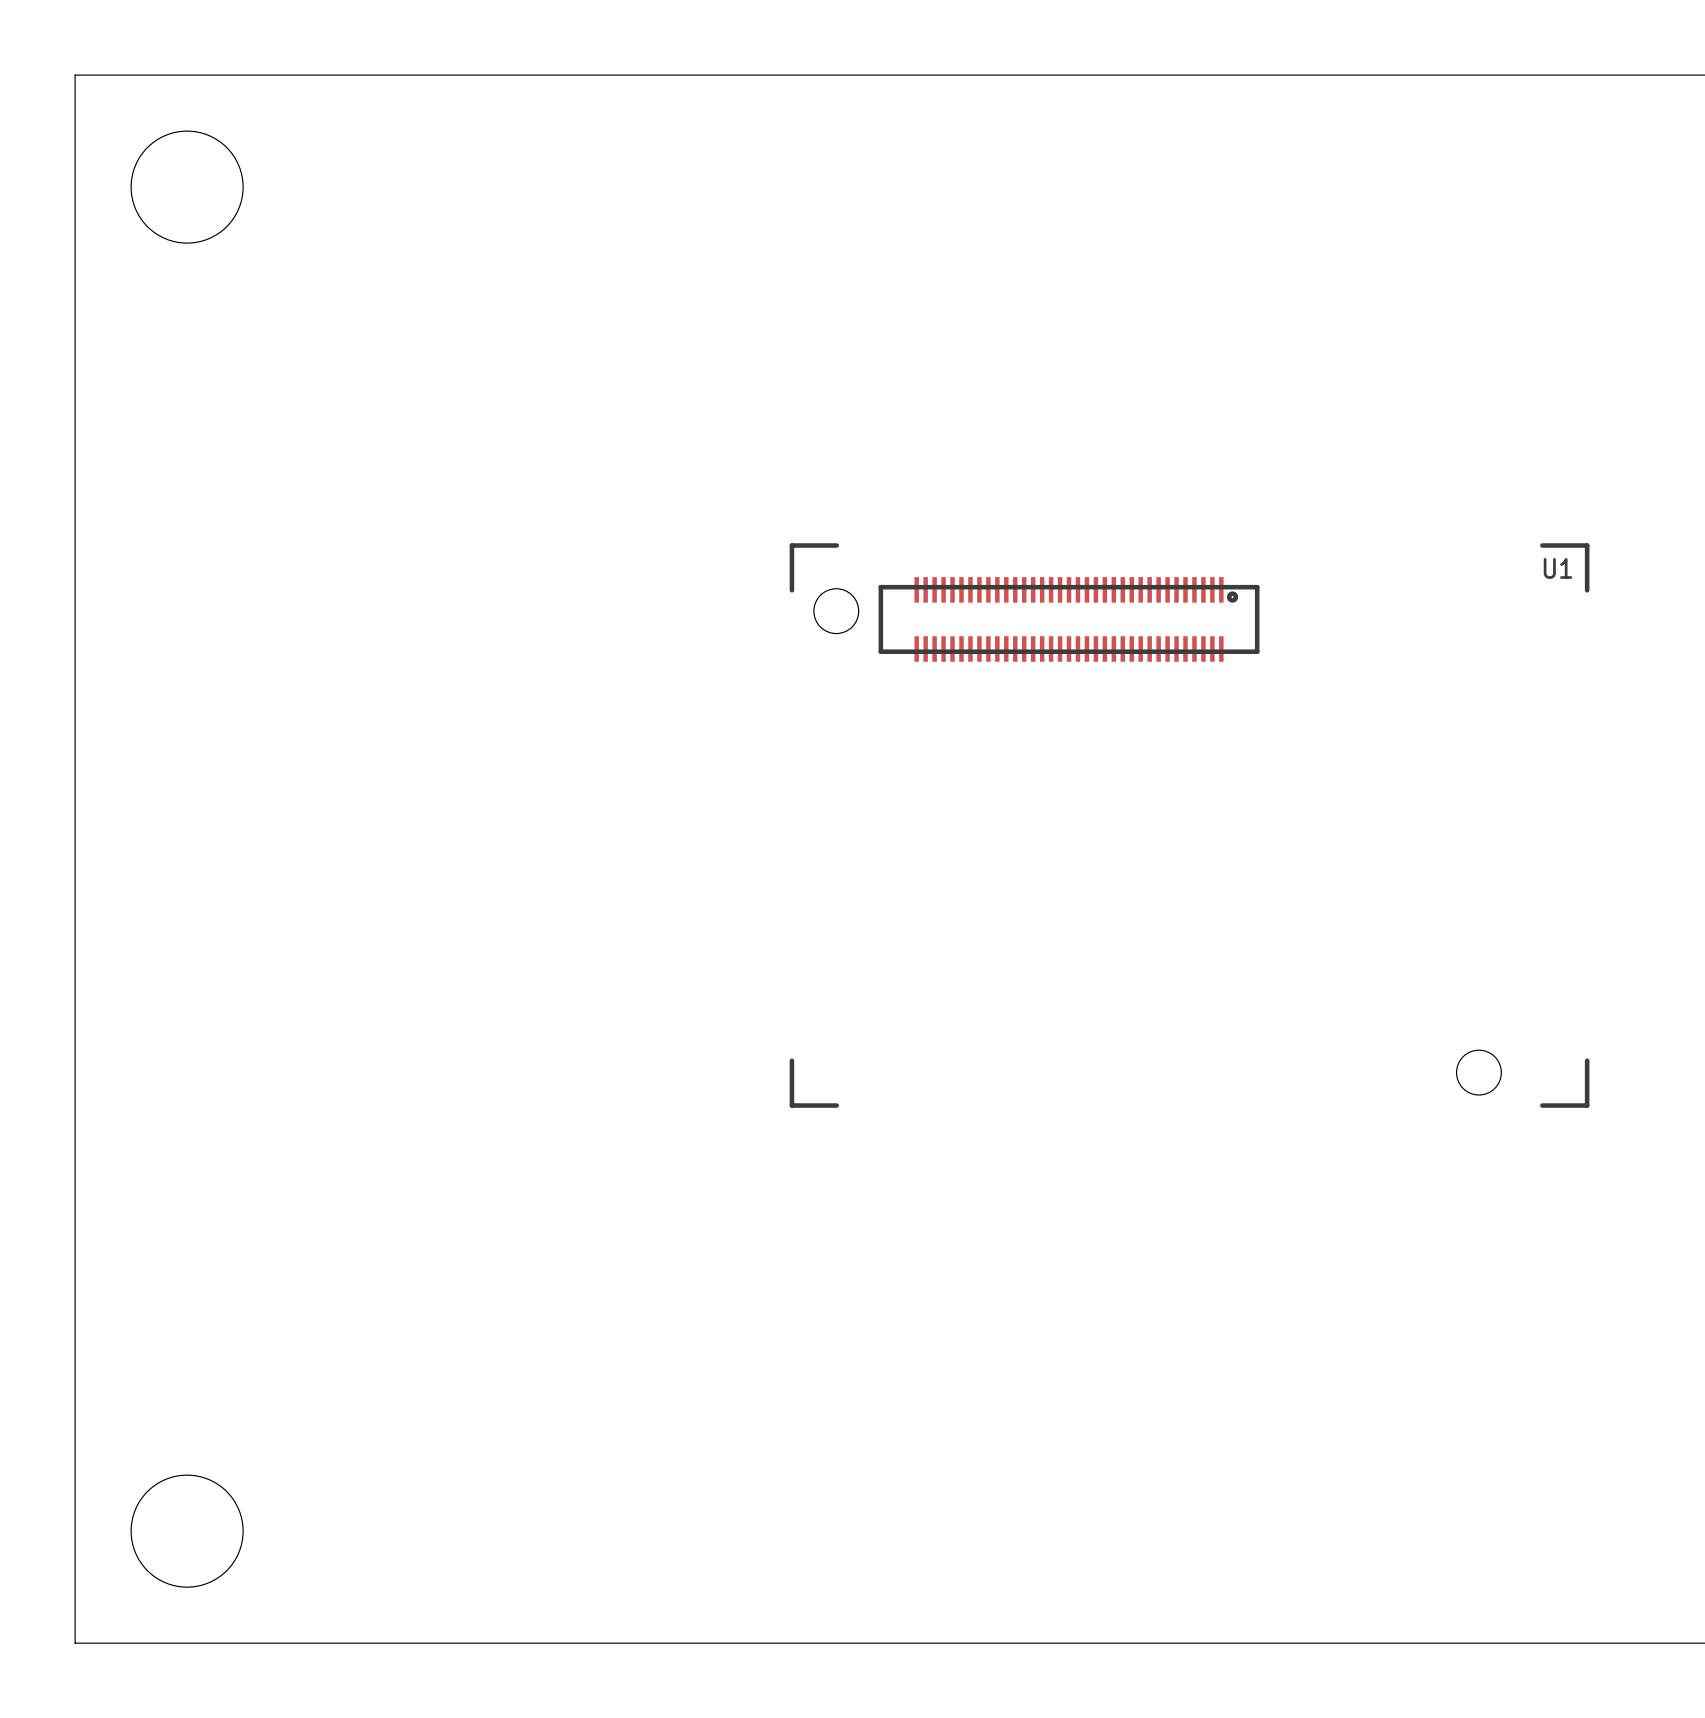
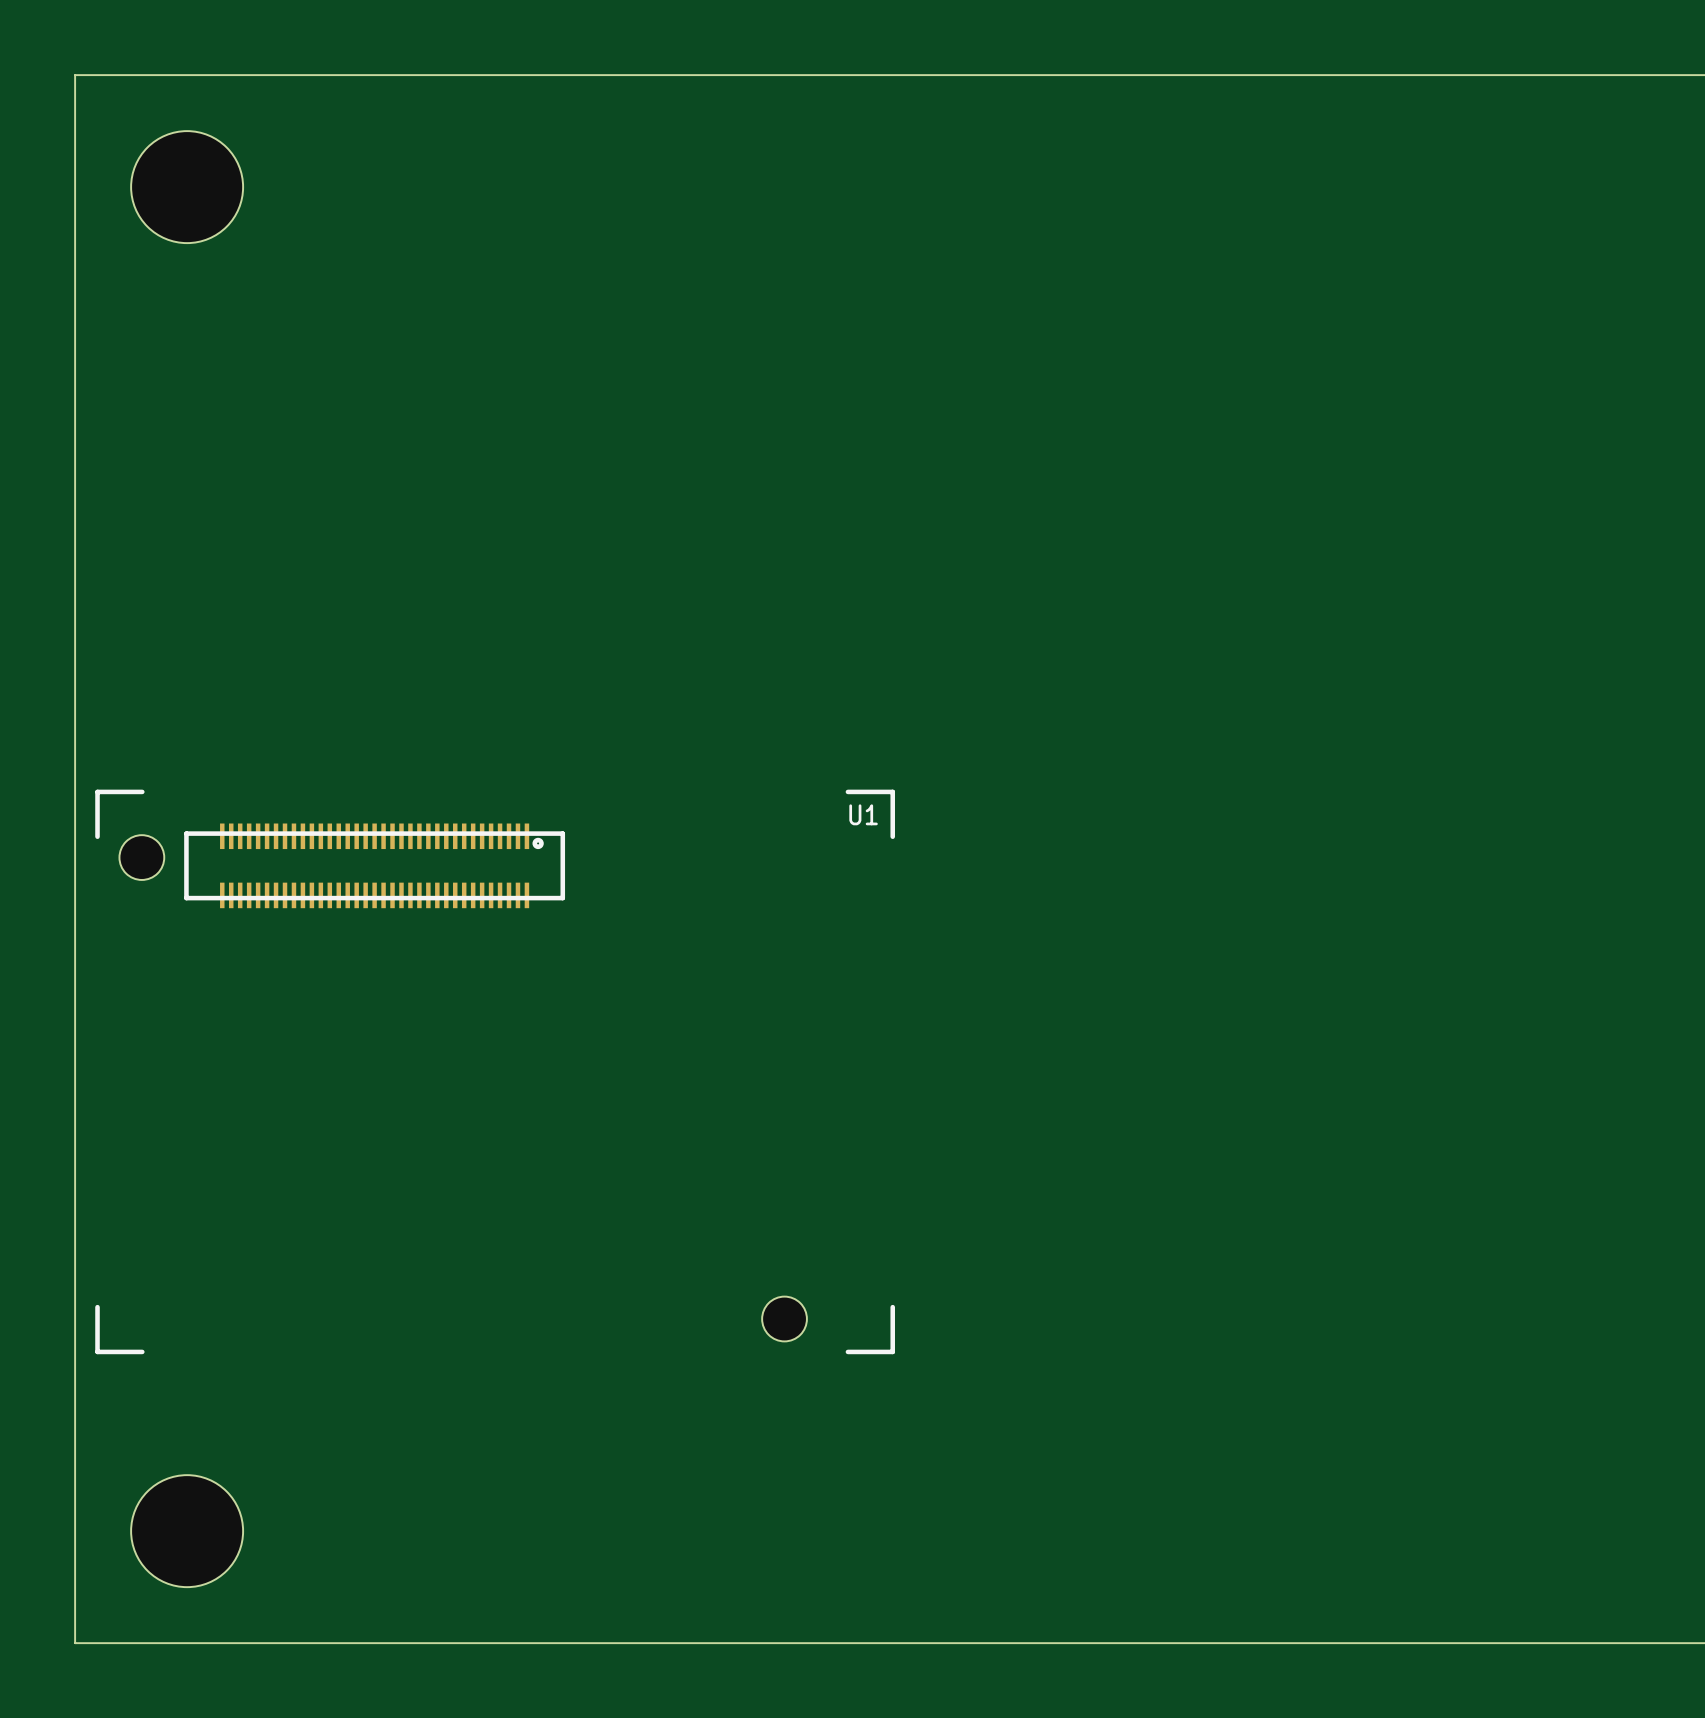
U1 position: (1189, 825) -> (495, 1071)

